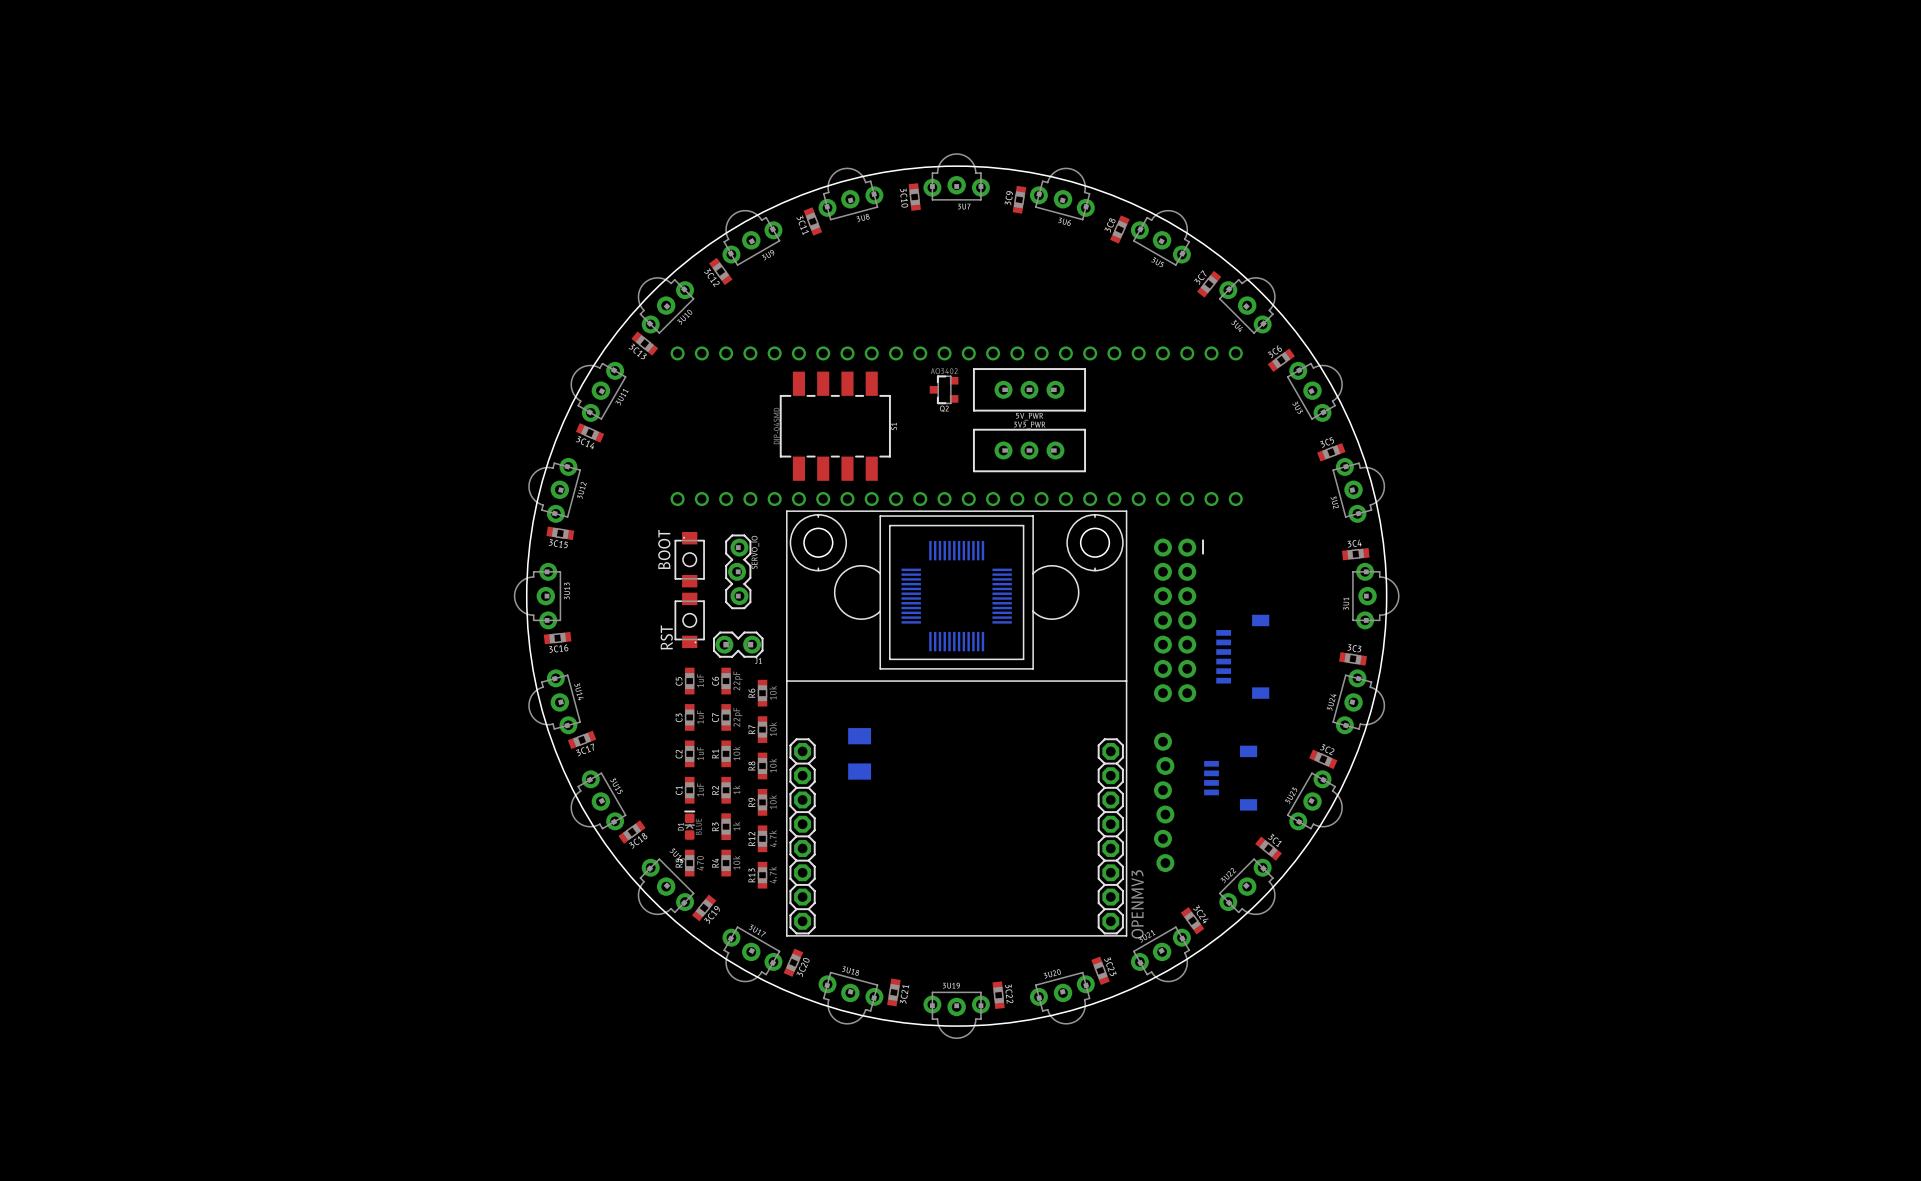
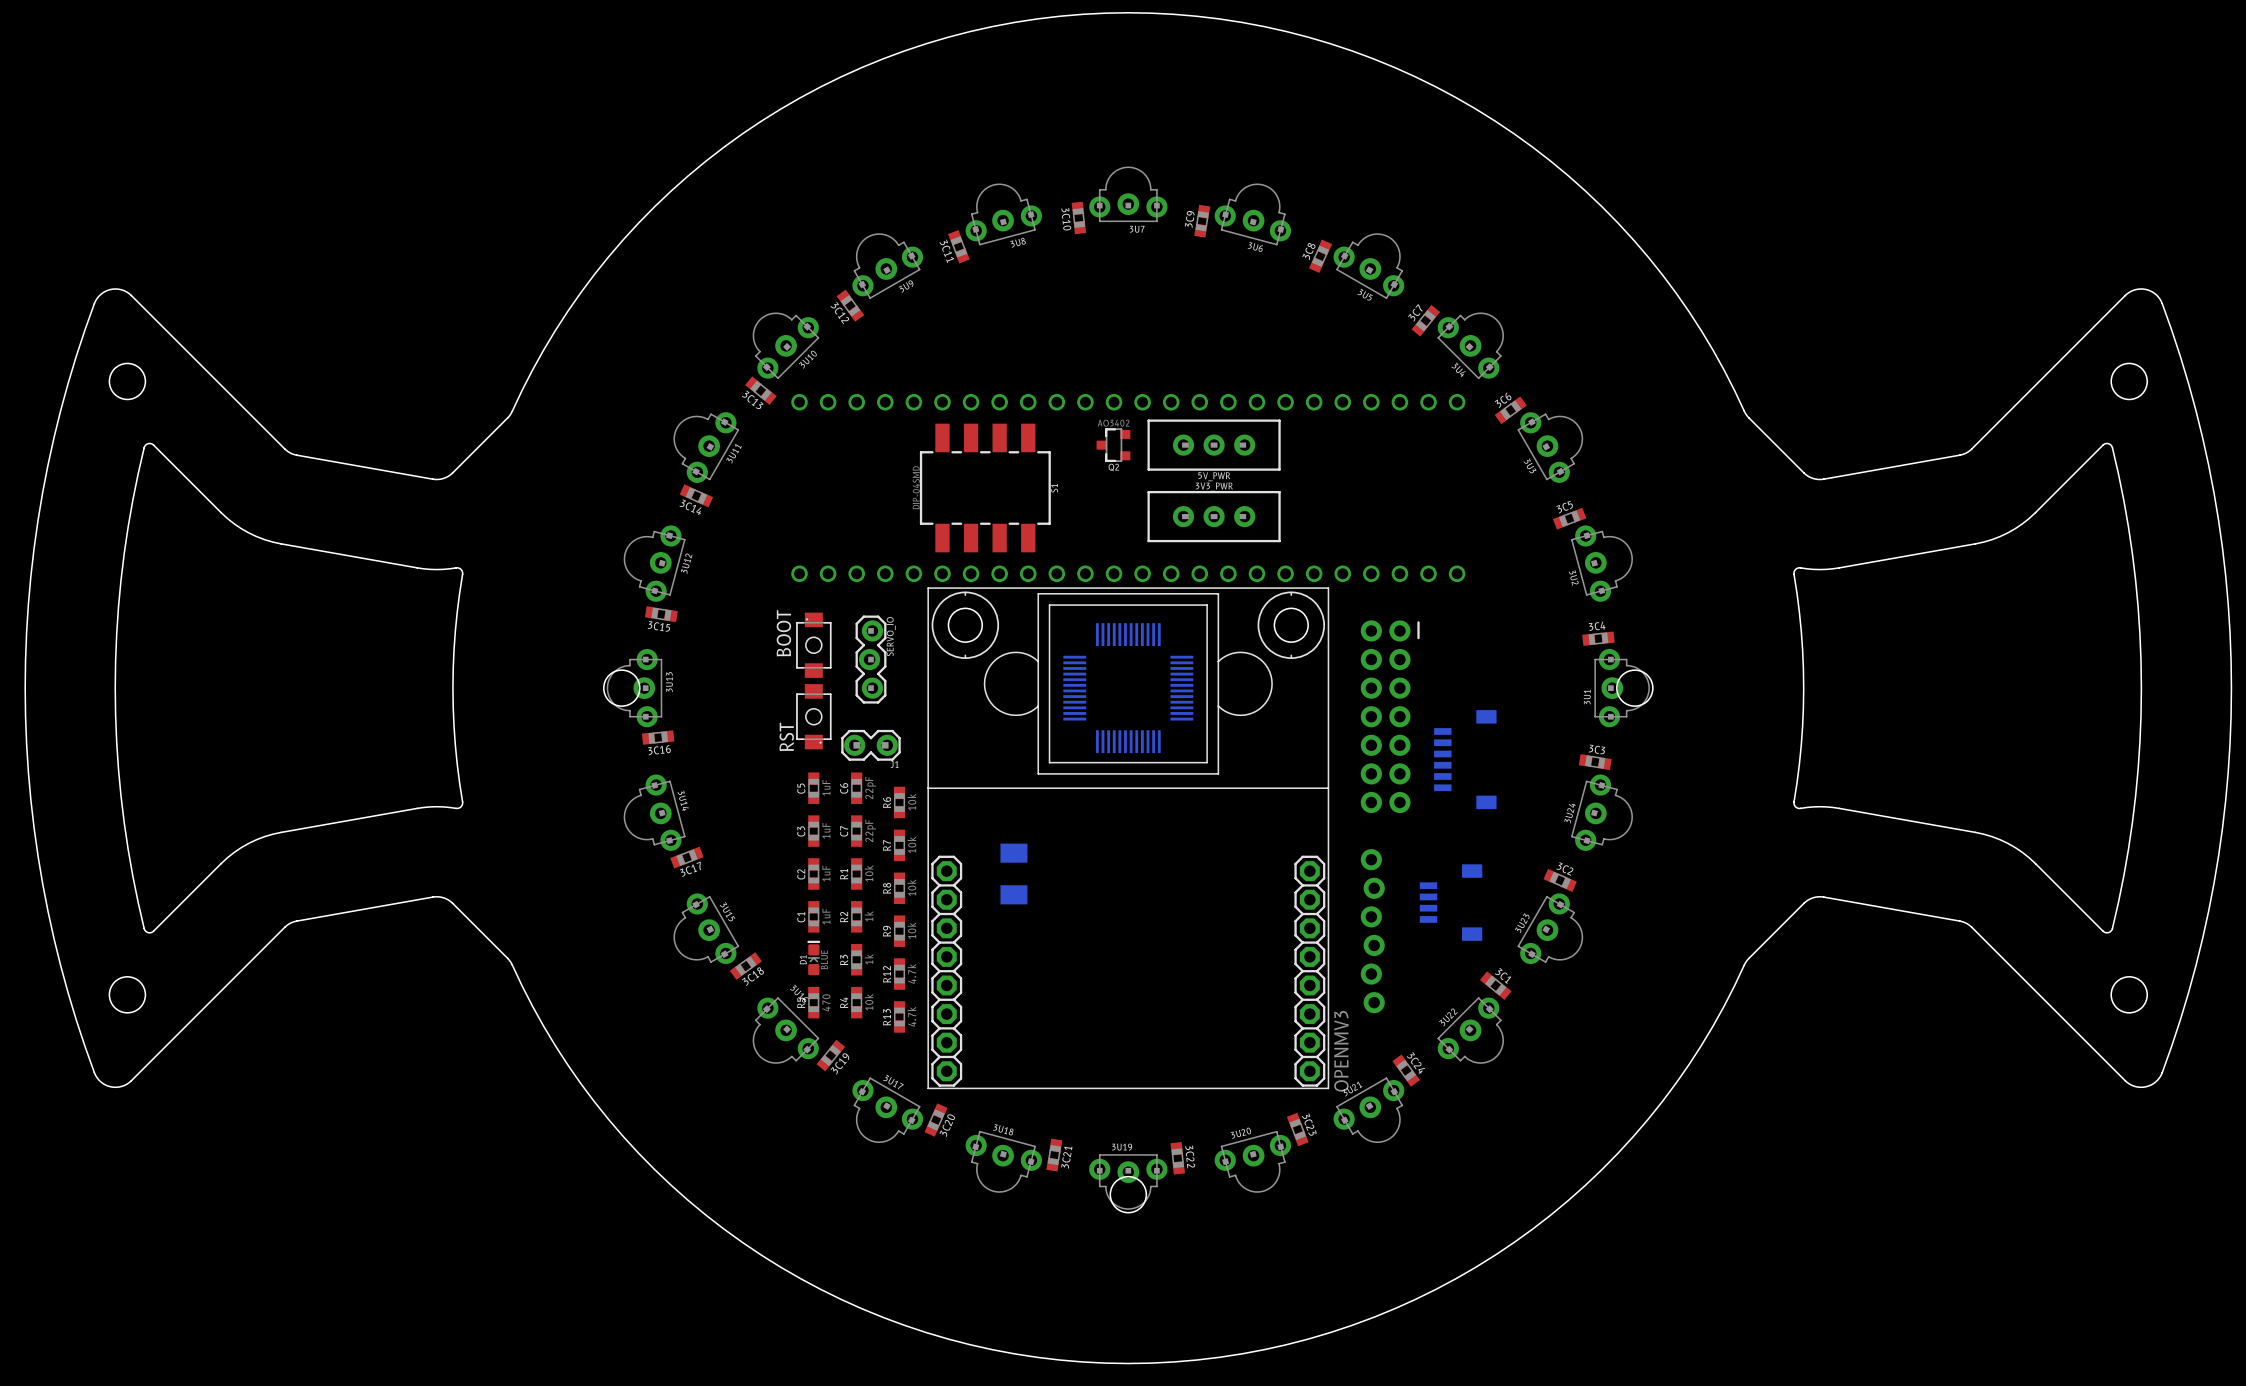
round board edge: [526, 166, 1387, 1027] -> none
board edge: none -> (131, 295) (290, 452) (432, 479) (443, 478) (452, 472) (510, 414) (555, 330) (580, 292) (623, 239) (654, 206) (688, 175) (742, 133) (780, 109) (841, 76) (883, 58) (926, 43) (970, 31) (1037, 18) (1082, 14) (1128, 12) (1173, 14) (1219, 18) (1286, 31) (1330, 43) (1373, 58) (1415, 76) (1475, 109) (1514, 133) (1568, 175) (1601, 206) (1633, 239) (1675, 292) (1701, 330) (1746, 414) (1803, 472) (1813, 478) (1823, 479) (1966, 452) (2125, 295) (2134, 289) (2148, 290) (2157, 296) (2162, 303) (2180, 356) (2202, 437) (2222, 548) (2231, 660) (2228, 772) (2214, 883) (2188, 992) (2162, 1072) (2155, 1081) (2145, 1086) (2134, 1086) (2127, 1082) (1966, 923) (1823, 897) (1813, 897) (1803, 903) (1746, 961) (1701, 1045) (1675, 1083) (1633, 1136) (1601, 1169) (1568, 1200) (1514, 1242) (1475, 1267) (1415, 1299) (1373, 1317) (1330, 1332) (1286, 1344) (1219, 1357) (1173, 1361) (1128, 1363) (1082, 1361) (1037, 1357) (970, 1344) (926, 1332) (883, 1317) (841, 1299) (780, 1267) (742, 1242) (688, 1200) (654, 1169) (623, 1136) (580, 1083) (555, 1045) (510, 961) (452, 903) (443, 897) (432, 897) (290, 923) (131, 1080) (121, 1086) (107, 1086) (100, 1081) (95, 1075) (84, 1046) (68, 992) (47, 911) (30, 800) (26, 744) (25, 660) (30, 576) (38, 520) (53, 437) (68, 383) (96, 298) (105, 291) (113, 289) (121, 289) (131, 295)
round board edge: none -> [109, 363, 146, 400]
round board edge: none -> [2111, 363, 2148, 400]
board edge: none -> (153, 445) (227, 518) (256, 536) (281, 543) (417, 567) (436, 569) (457, 567) (461, 569) (462, 573) (455, 631) (452, 688) (455, 745) (462, 802) (458, 808) (436, 806) (417, 808) (281, 832) (256, 839) (227, 857) (153, 931) (149, 932) (144, 929) (138, 902) (124, 822) (116, 742) (115, 688) (118, 607) (128, 527) (144, 447) (148, 443) (153, 445)
board edge: none -> (2103, 445) (2029, 518) (2000, 536) (1975, 543) (1839, 567) (1819, 569) (1799, 567) (1795, 569) (1793, 573) (1801, 631) (1803, 688) (1801, 745) (1793, 802) (1798, 808) (1819, 806) (1839, 808) (1975, 832) (2000, 839) (2029, 857) (2103, 931) (2107, 932) (2112, 929) (2118, 902) (2132, 822) (2139, 742) (2141, 688) (2138, 607) (2128, 527) (2112, 447) (2107, 443) (2103, 445)
round board edge: none -> [603, 670, 640, 707]
round board edge: none -> [1616, 670, 1653, 707]
round board edge: none -> [109, 976, 146, 1013]
round board edge: none -> [2111, 976, 2148, 1013]
round board edge: none -> [1110, 1176, 1147, 1213]

